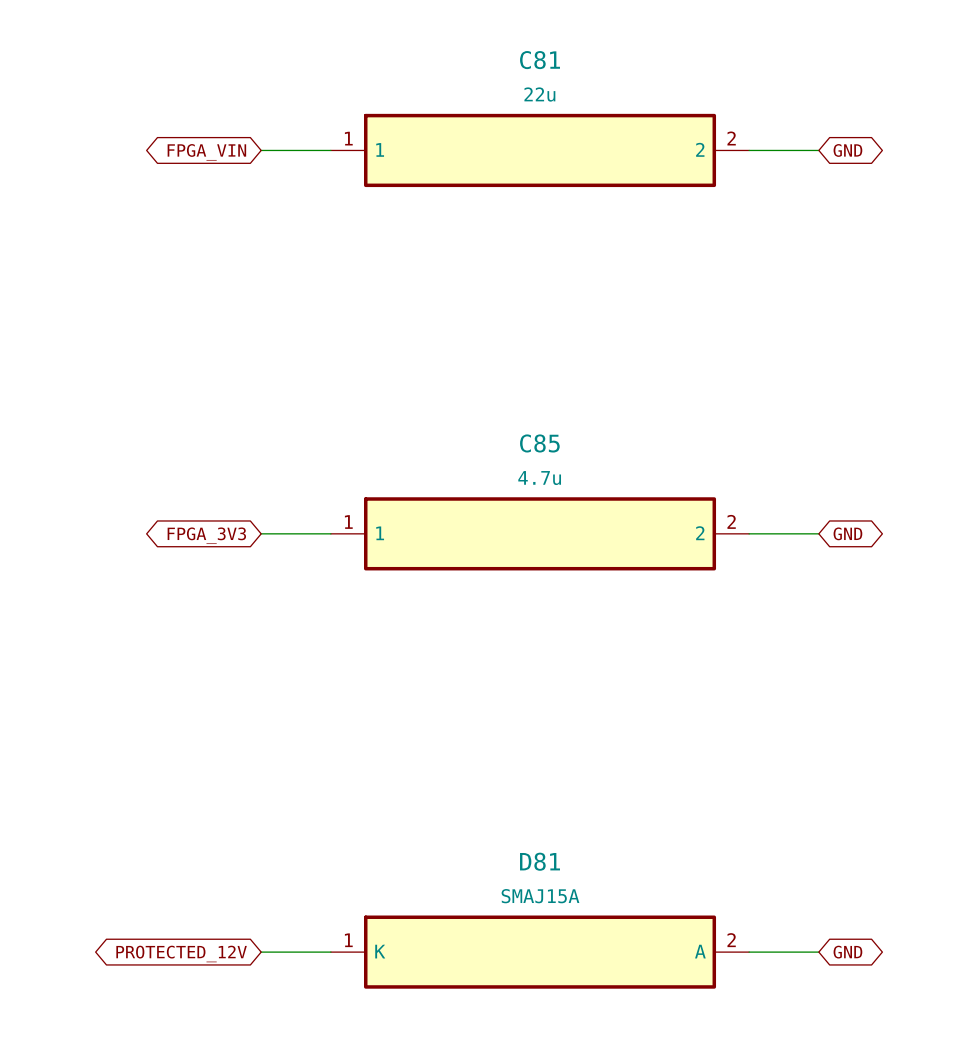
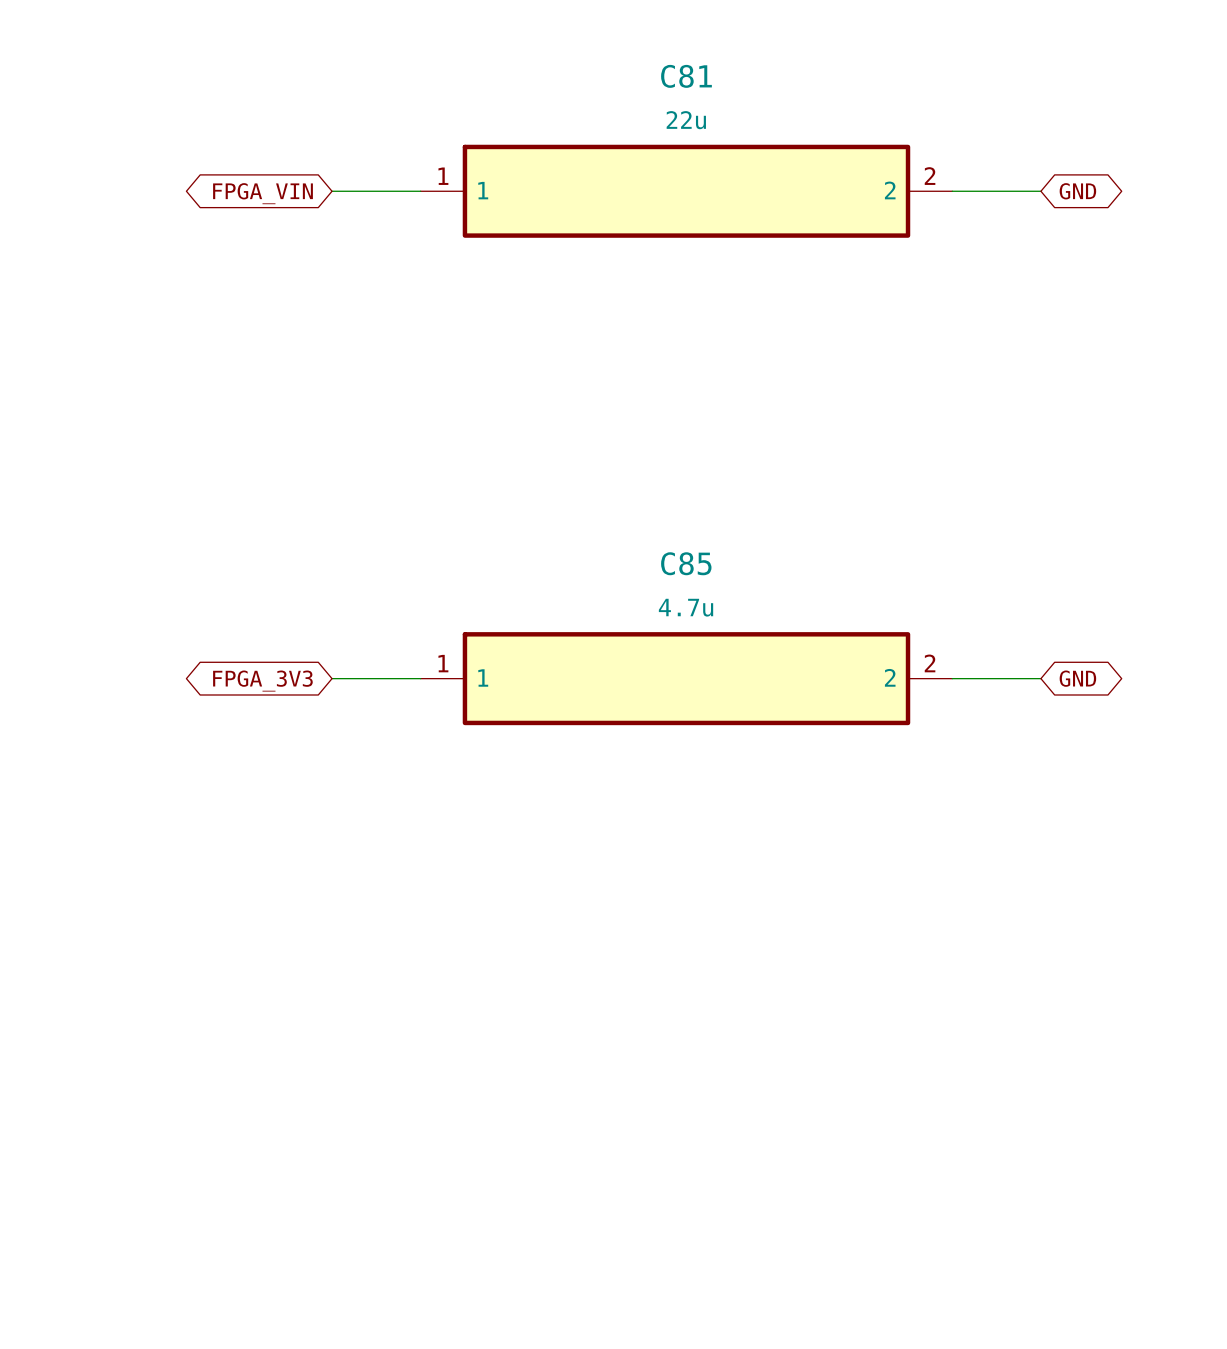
wire: (261, 952) (330, 952) -> none
D81: SMAJ15A (540, 952) -> none
wire: (749, 952) (818, 952) -> none
global label: GND (847, 952) -> none
global label: PROTECTED_12V (181, 953) -> none

